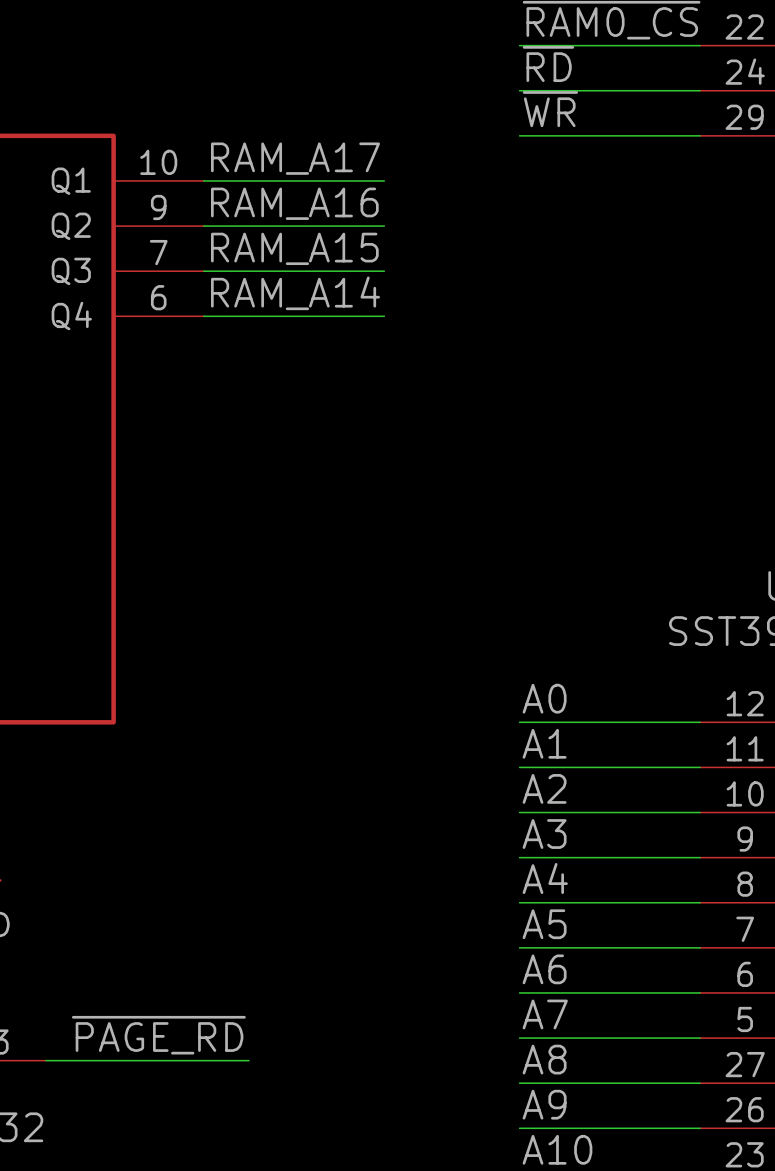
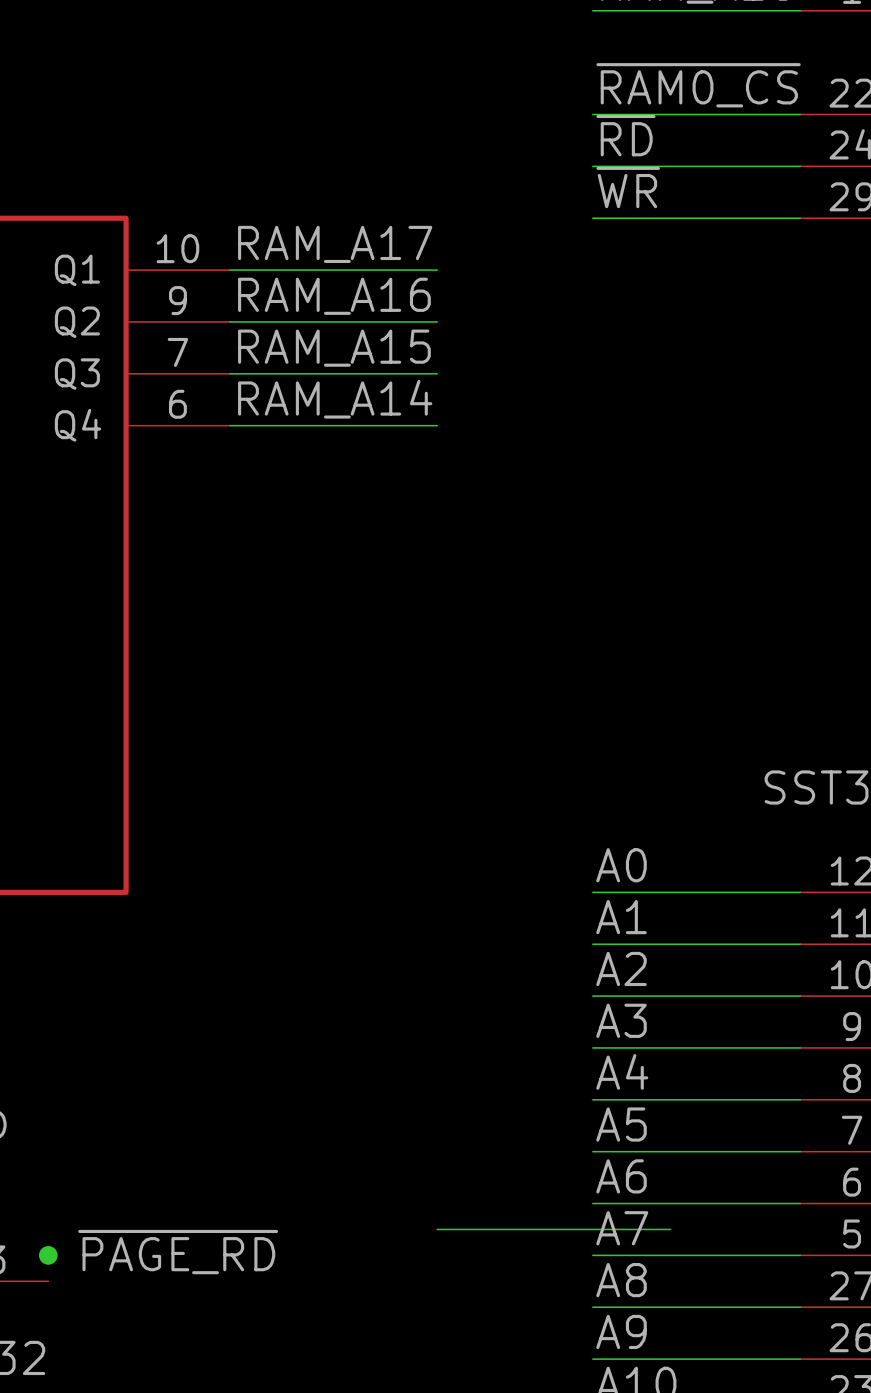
junction: none -> (48, 1255)
wire: (45, 1060) (248, 1060) -> (437, 1229) (670, 1229)

